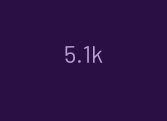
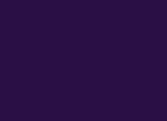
part: 5.1k (83, 54) -> none

